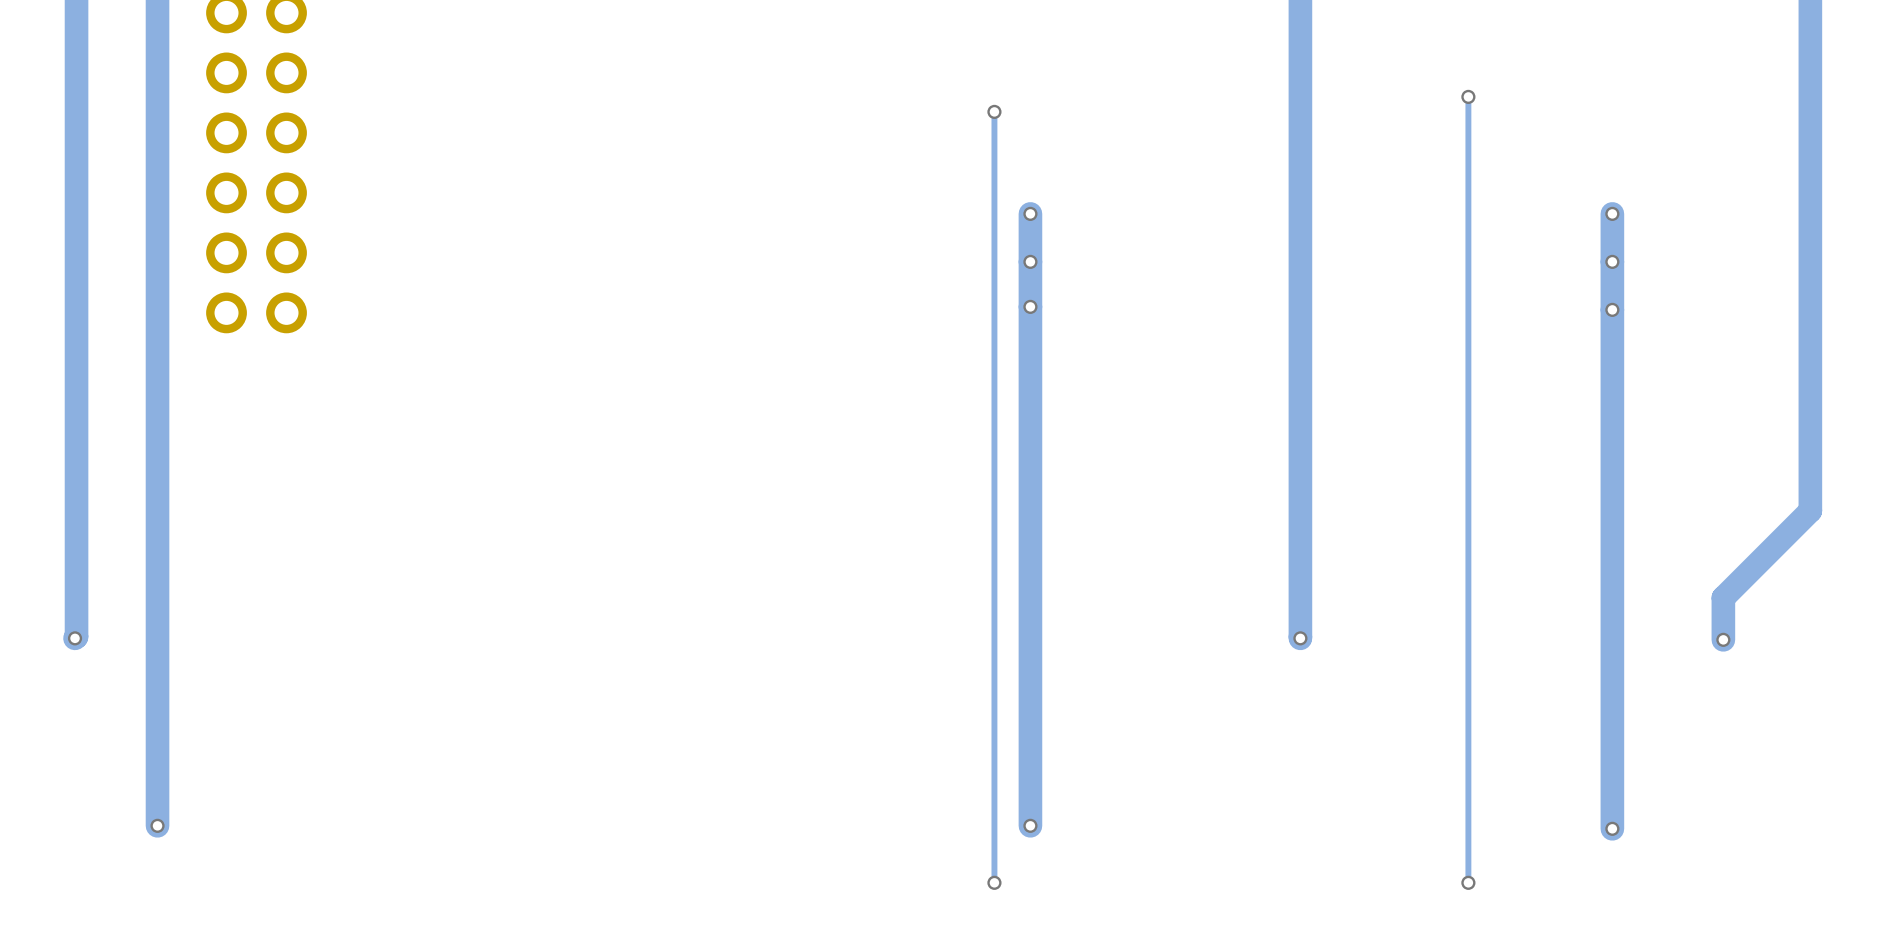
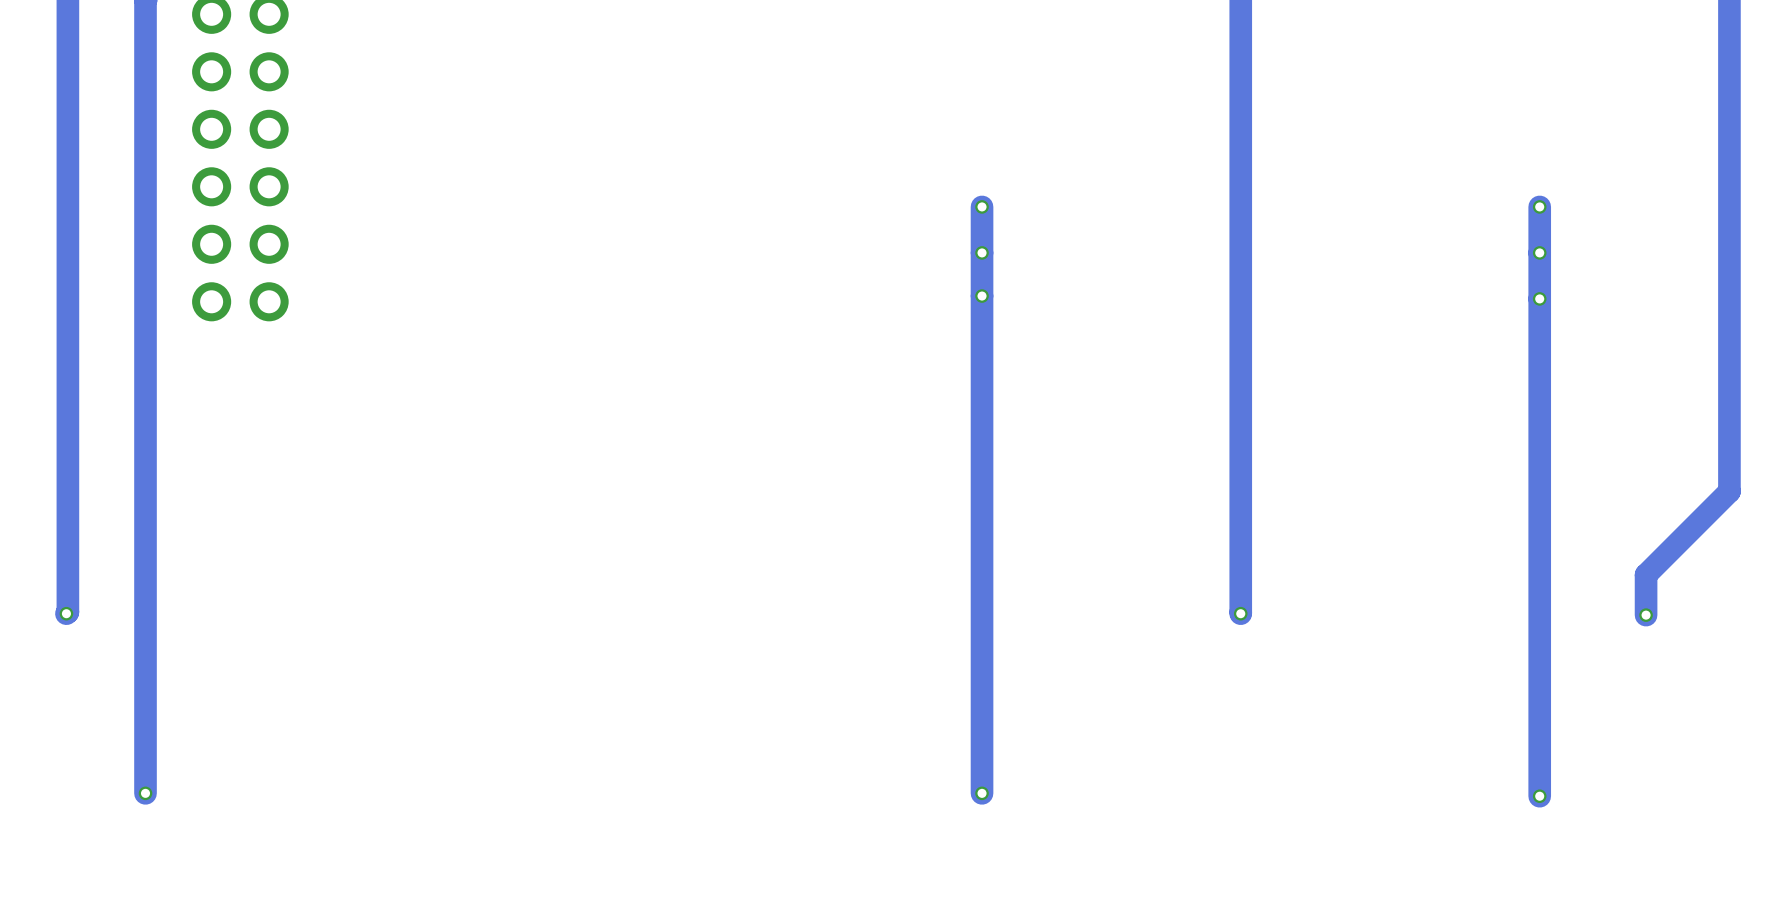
track: (1468, 96) (1468, 882) -> none
via: (1468, 96) -> none
track: (994, 111) (994, 882) -> none
via: (994, 111) -> none
via: (994, 882) -> none
via: (1468, 882) -> none

